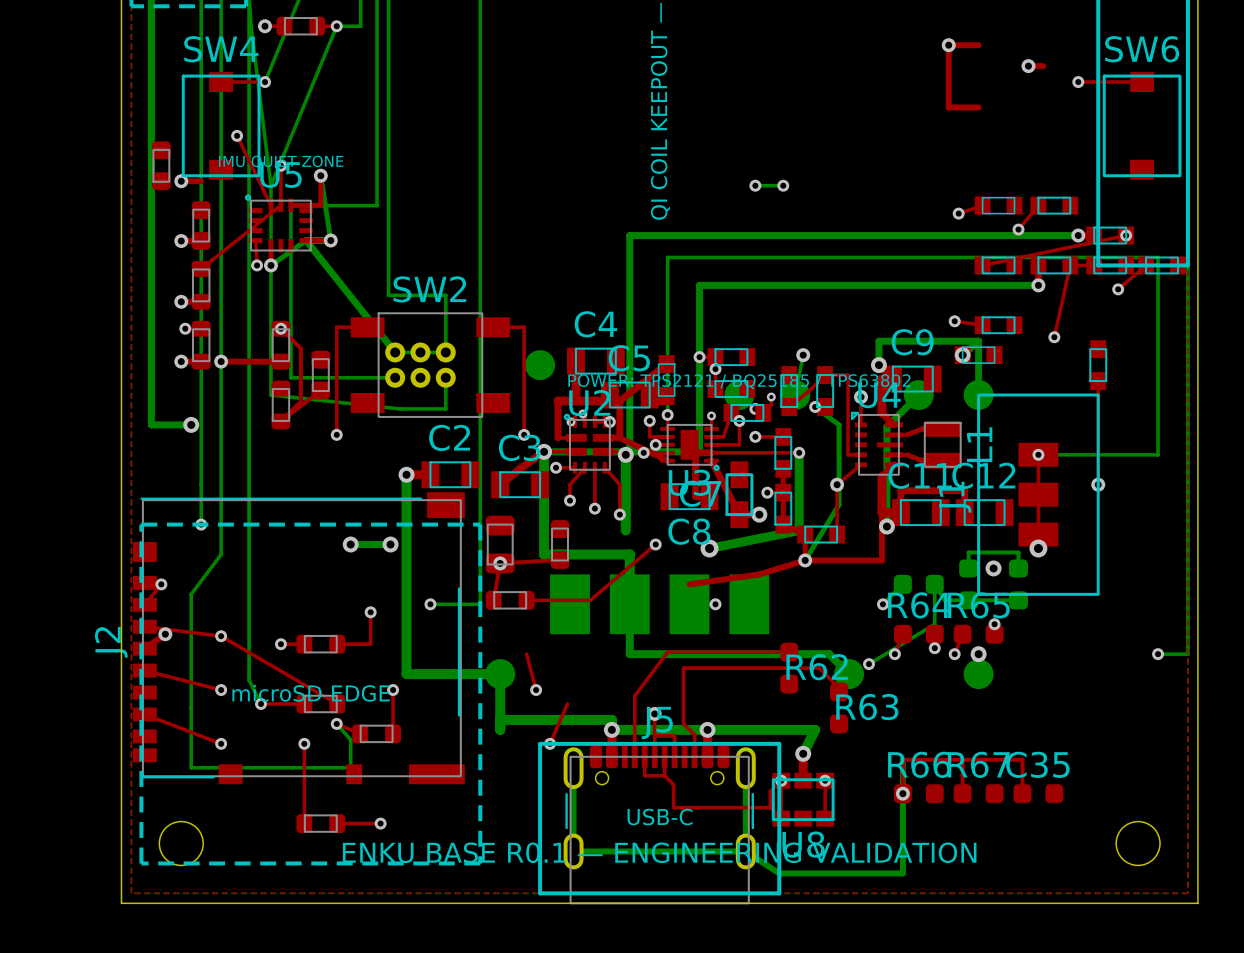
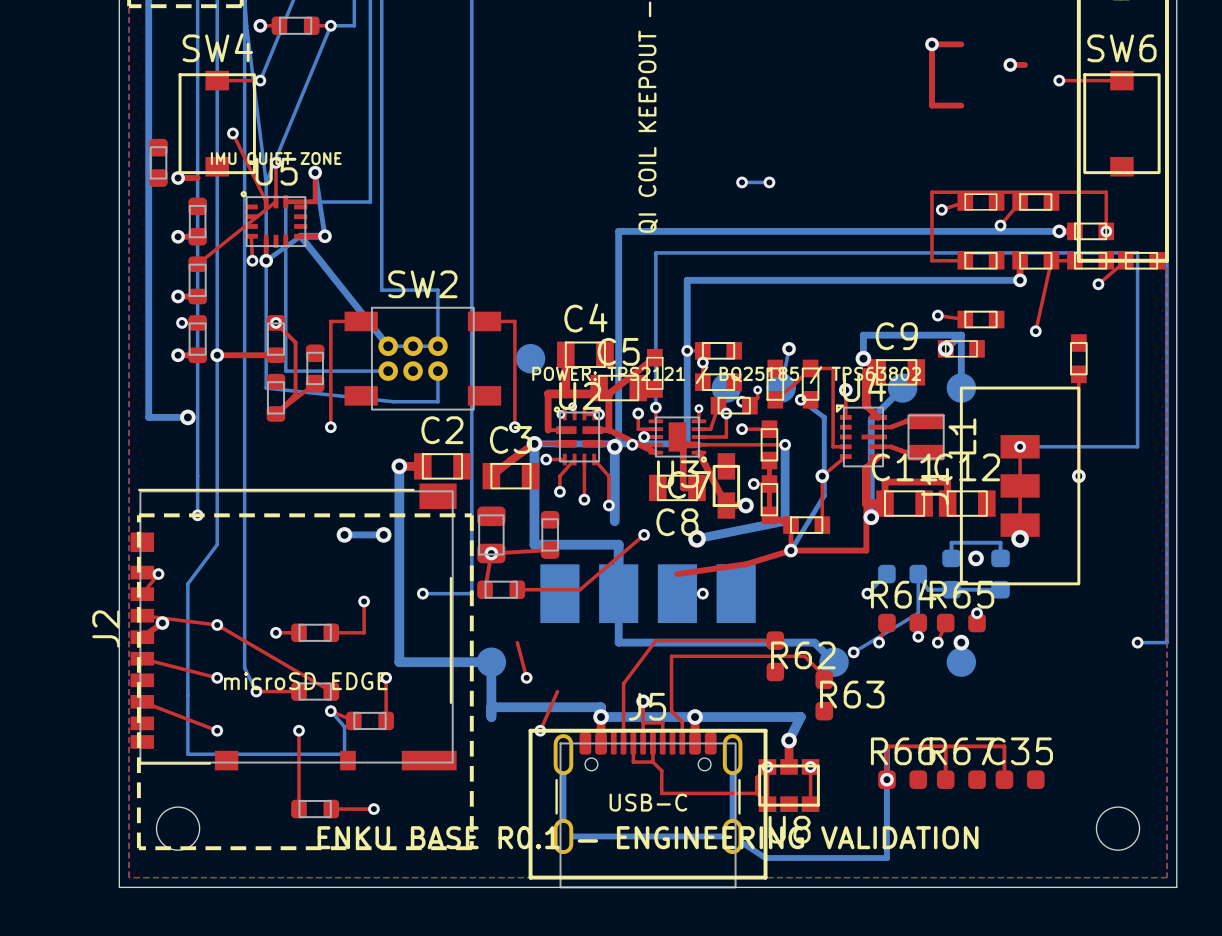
top track: (1126, 235) (982, 265) -> (1106, 231) (1106, 192) (931, 192) (931, 260) (965, 260)

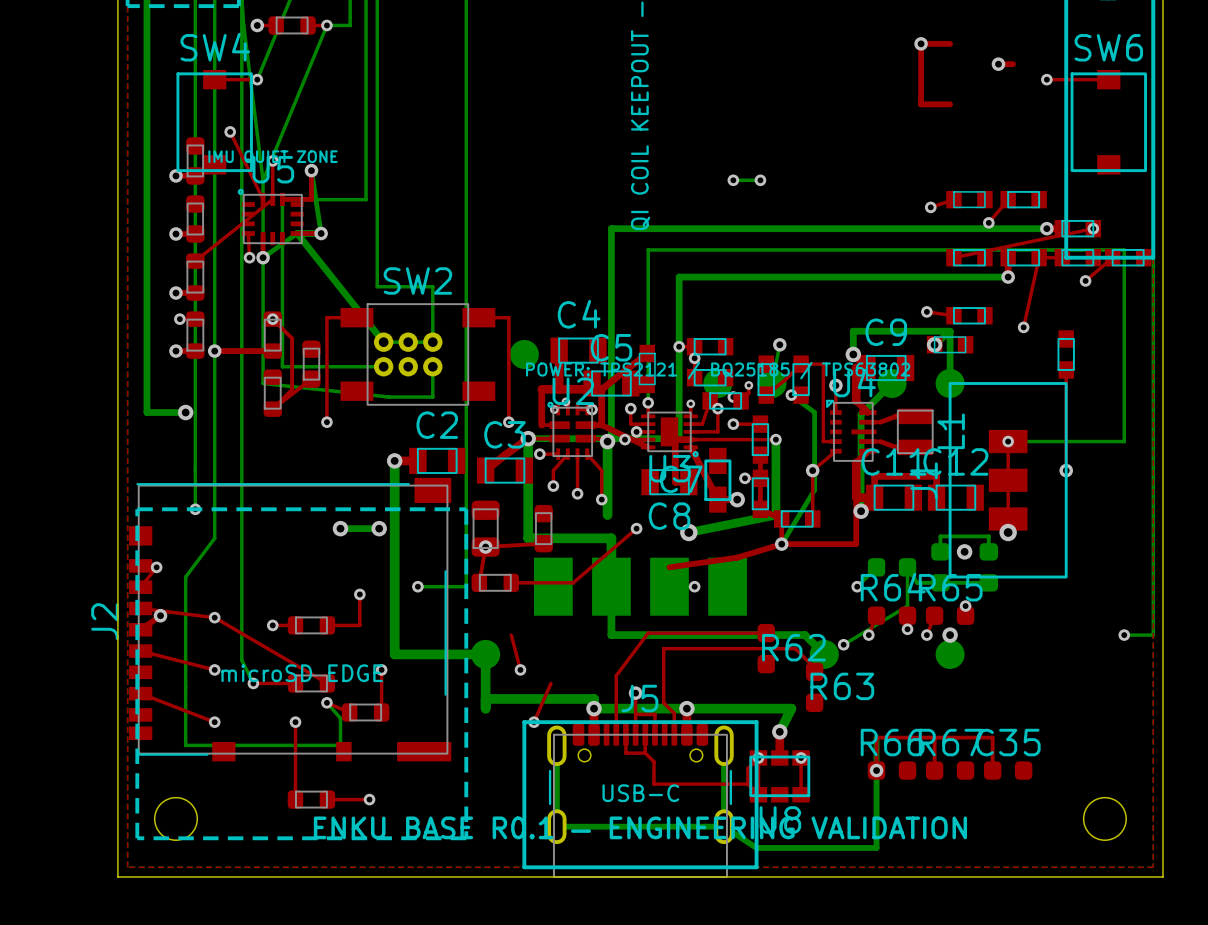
part position: (158, 162) -> (195, 160)
top track: (1106, 231) (1106, 192) (931, 192) (931, 260) (965, 260) -> (1093, 228) (953, 257)

